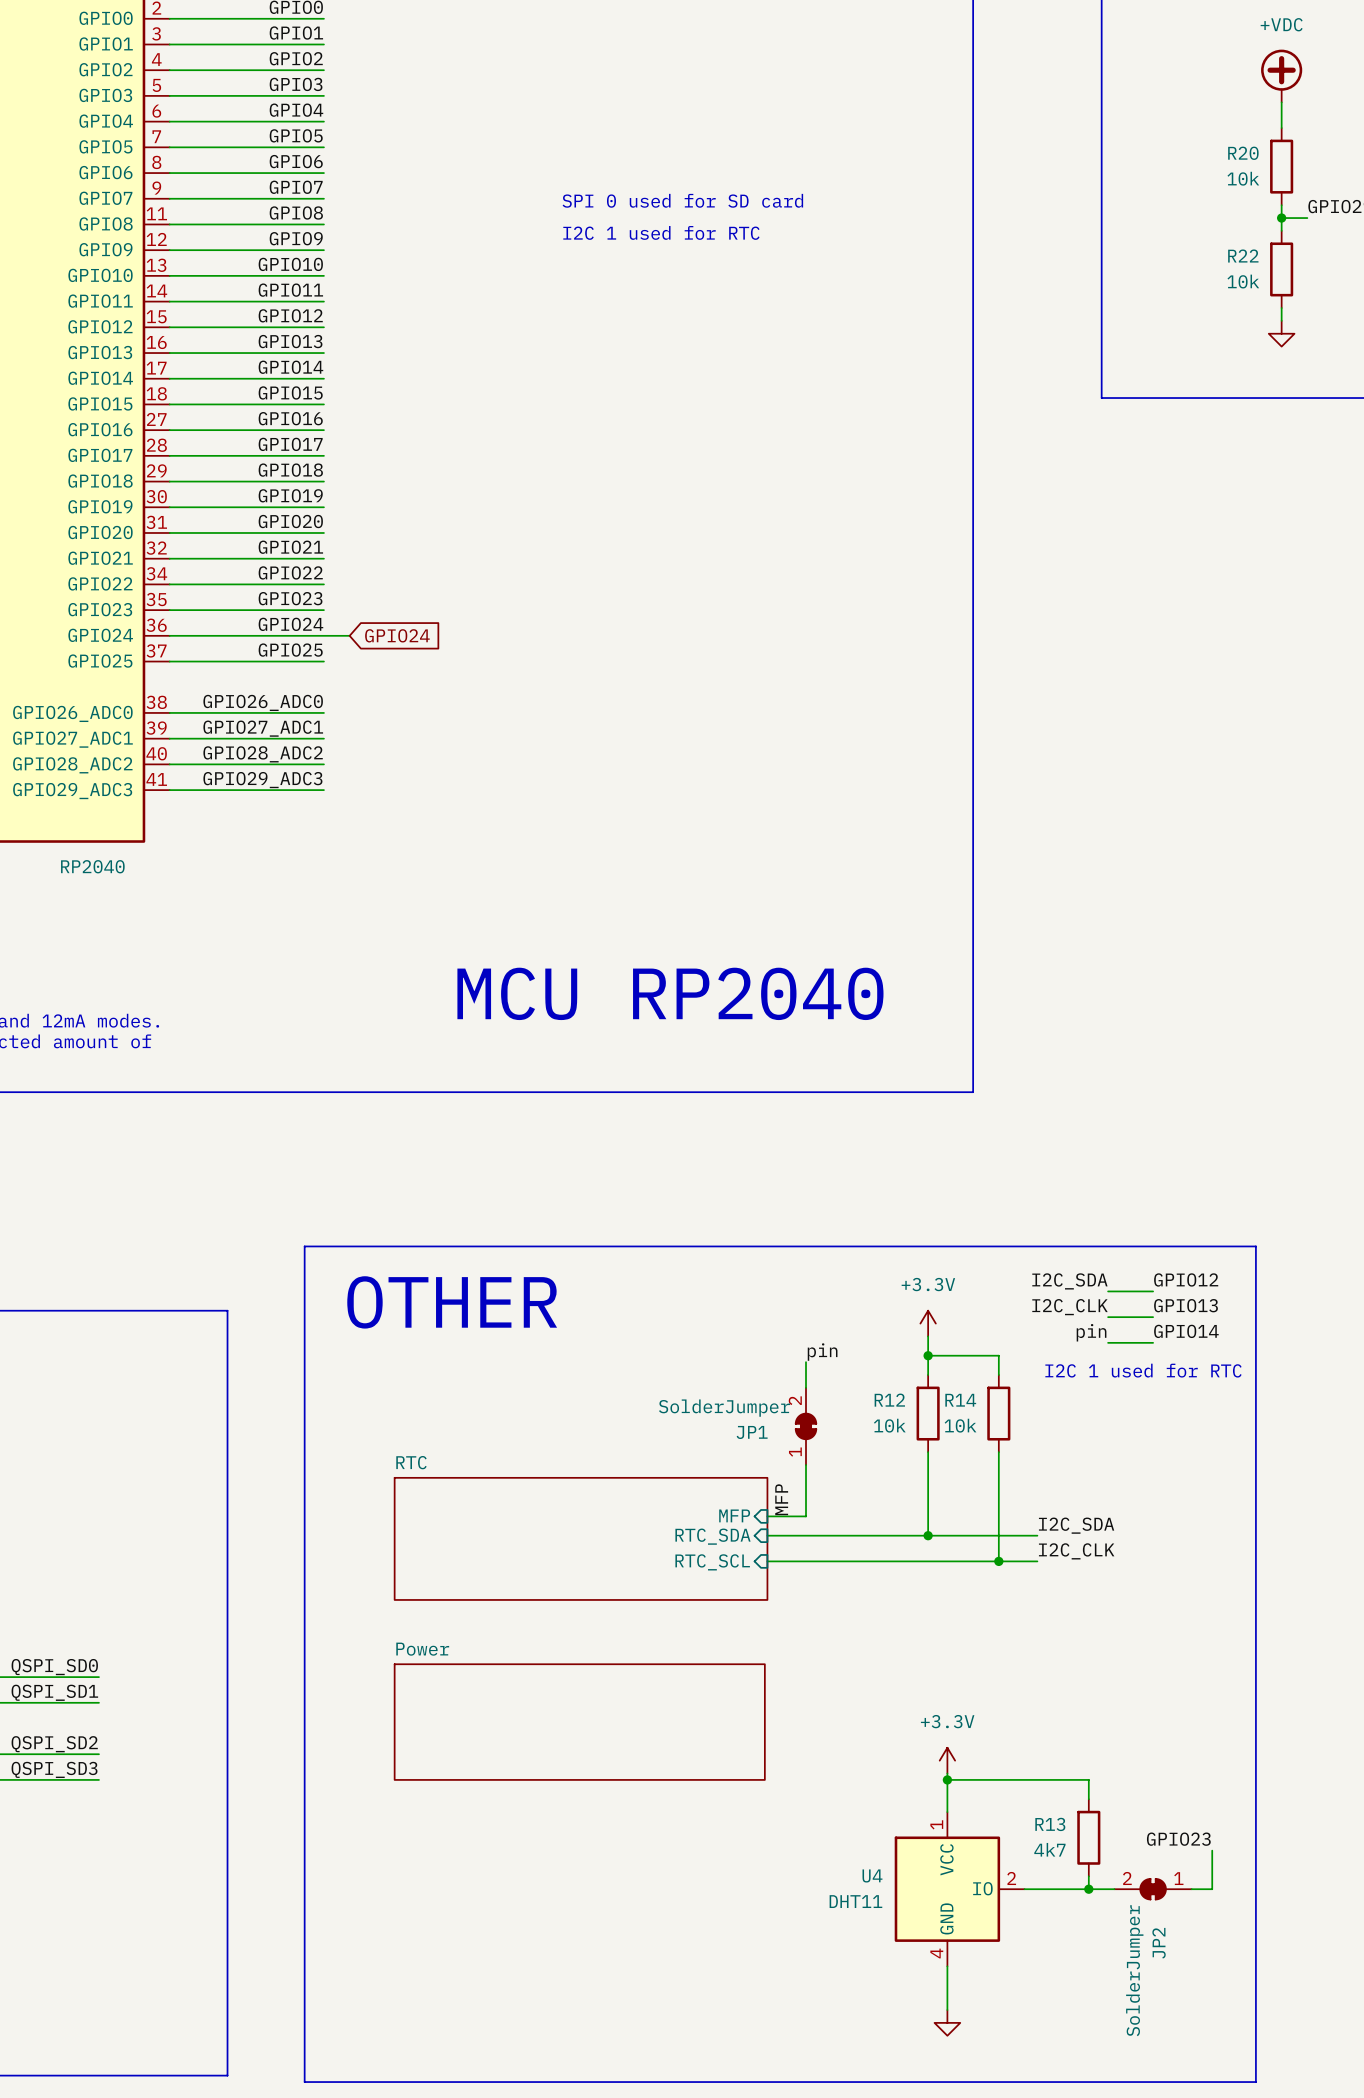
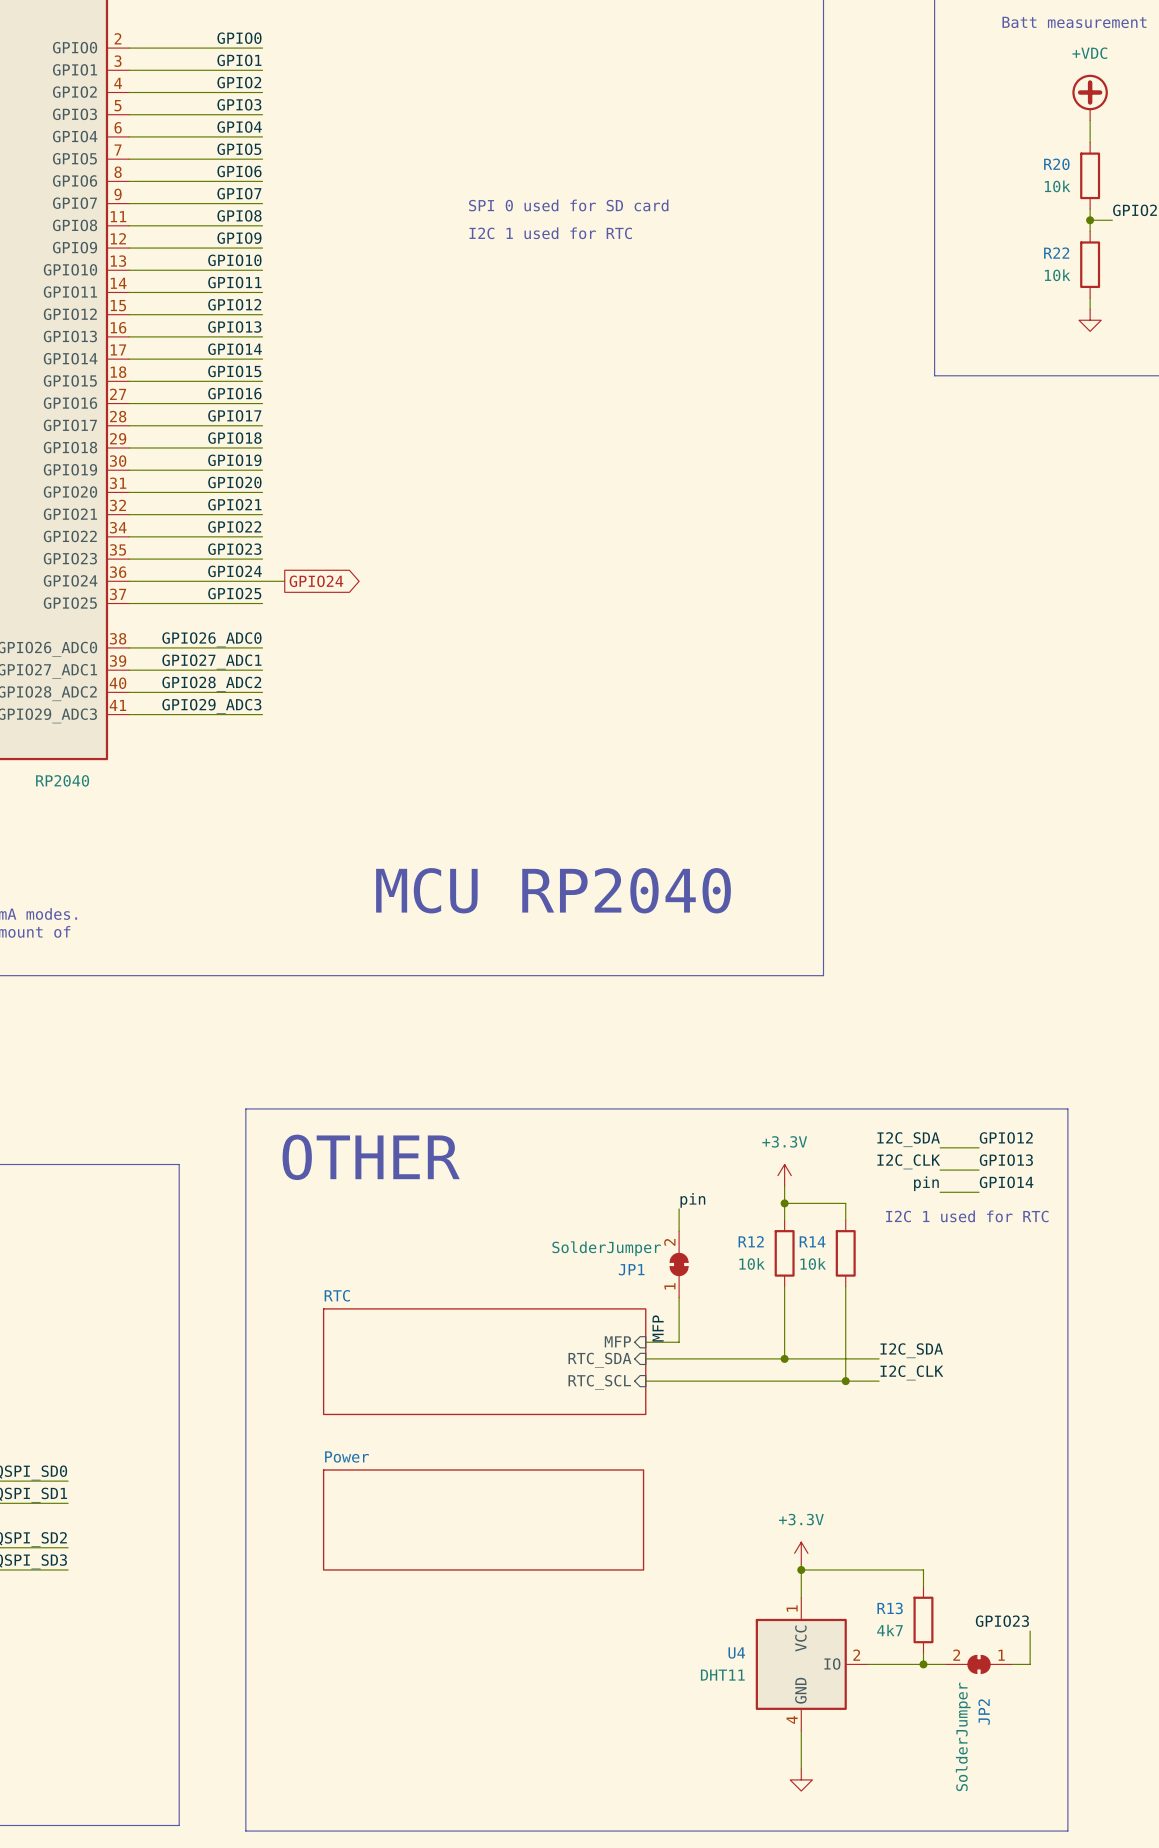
global label shape: input (397, 635) -> output (316, 581)

